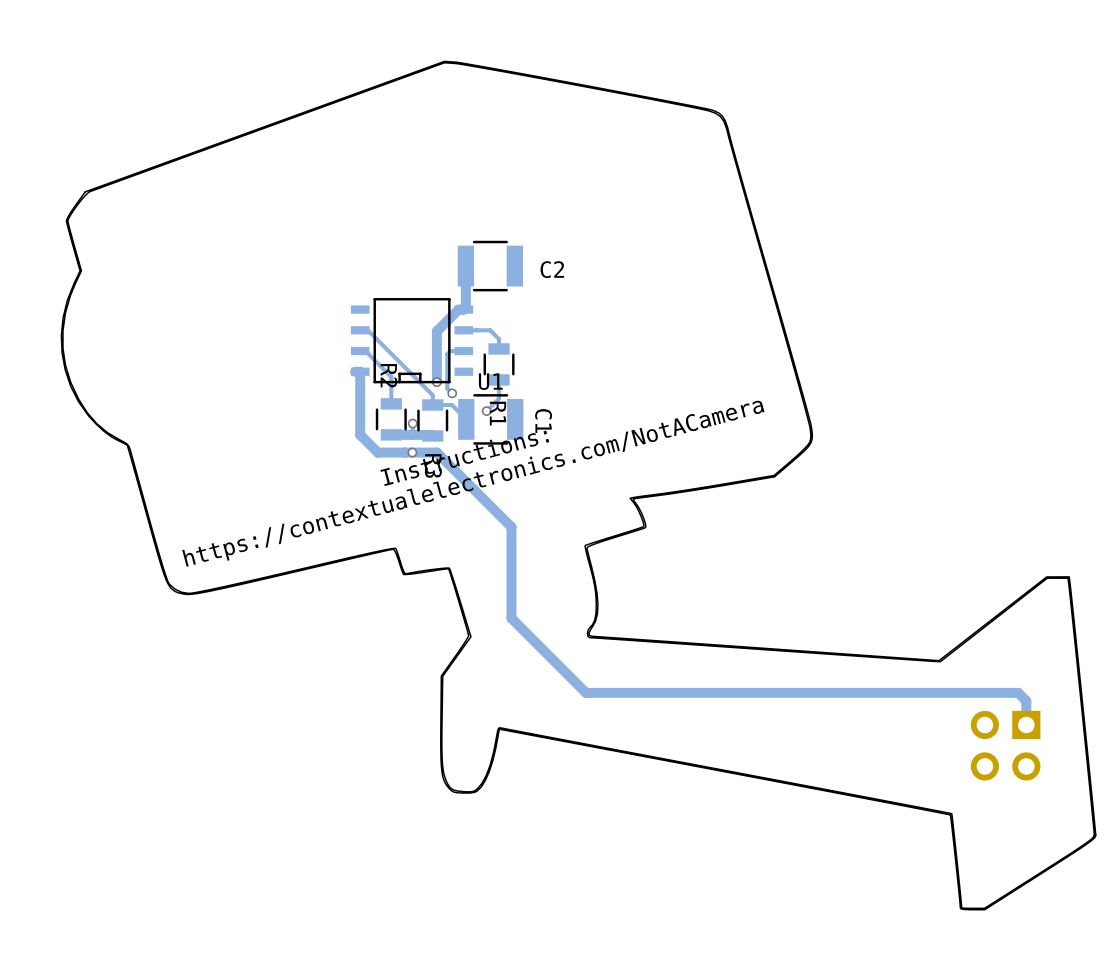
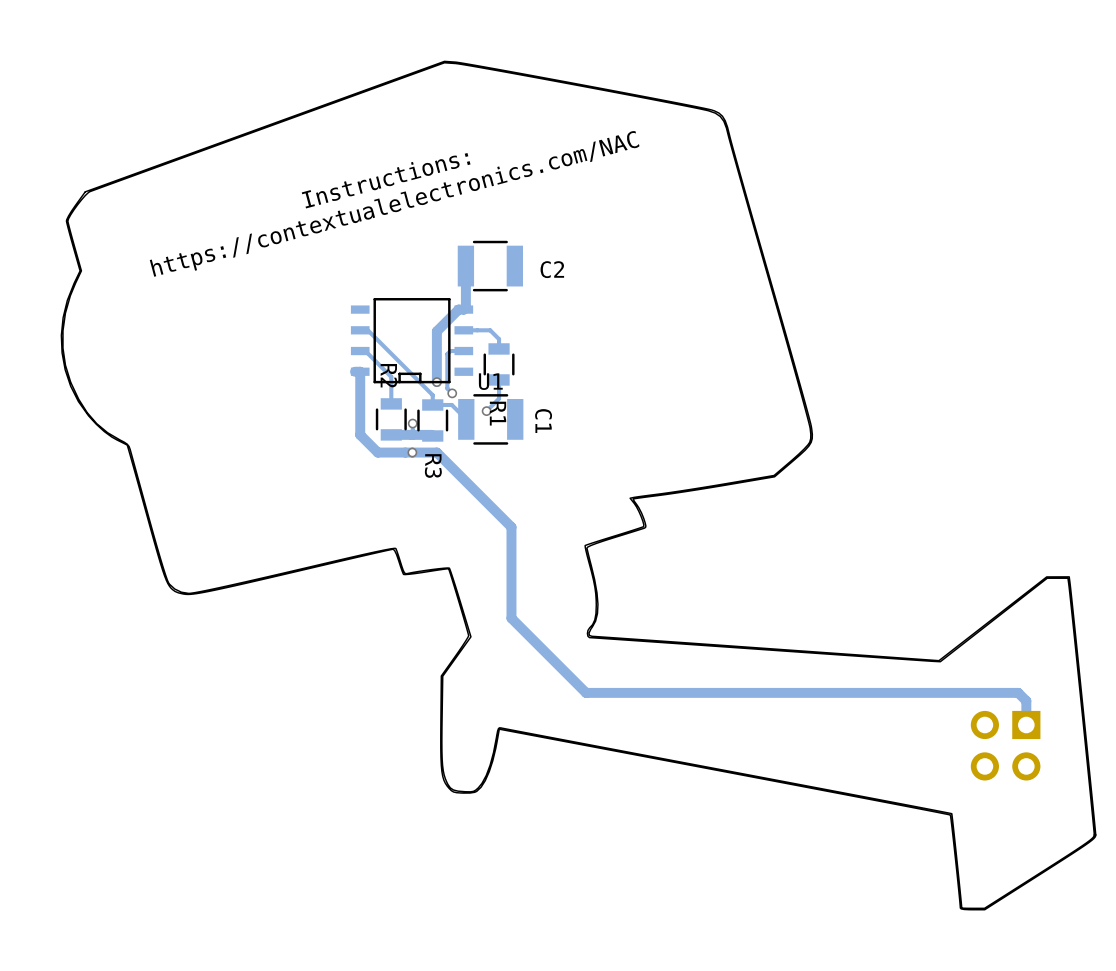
text: none -> https://contextualelectronics.com/NAC (394, 203)
text position: Instructions: (464, 458) -> Instructions: (386, 180)
text: https://contextualelectronics.com/NotACamera (473, 483) -> none

